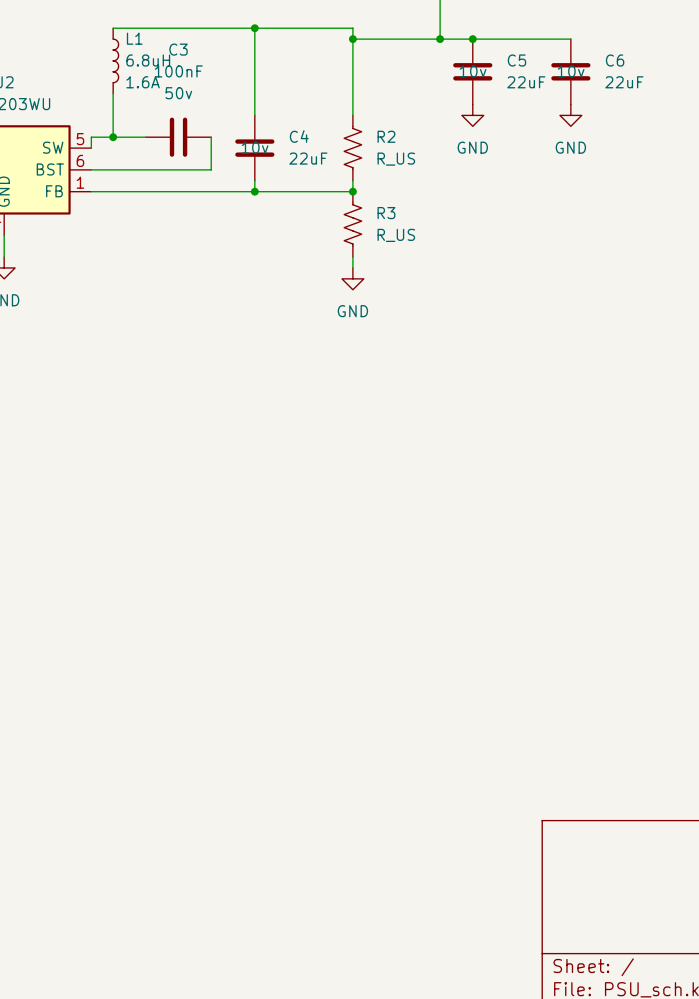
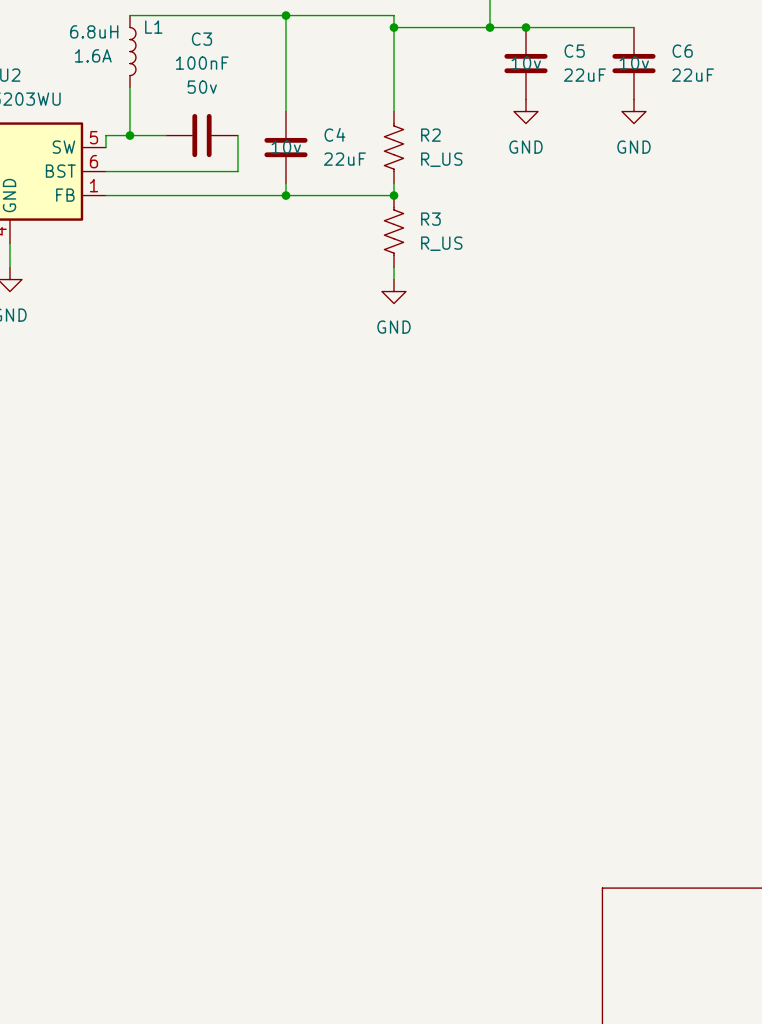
L1 text position: 6.8uH (148, 60) -> 6.8uH (94, 31)
L1 text position: 1.6A (143, 82) -> 1.6A (93, 55)

